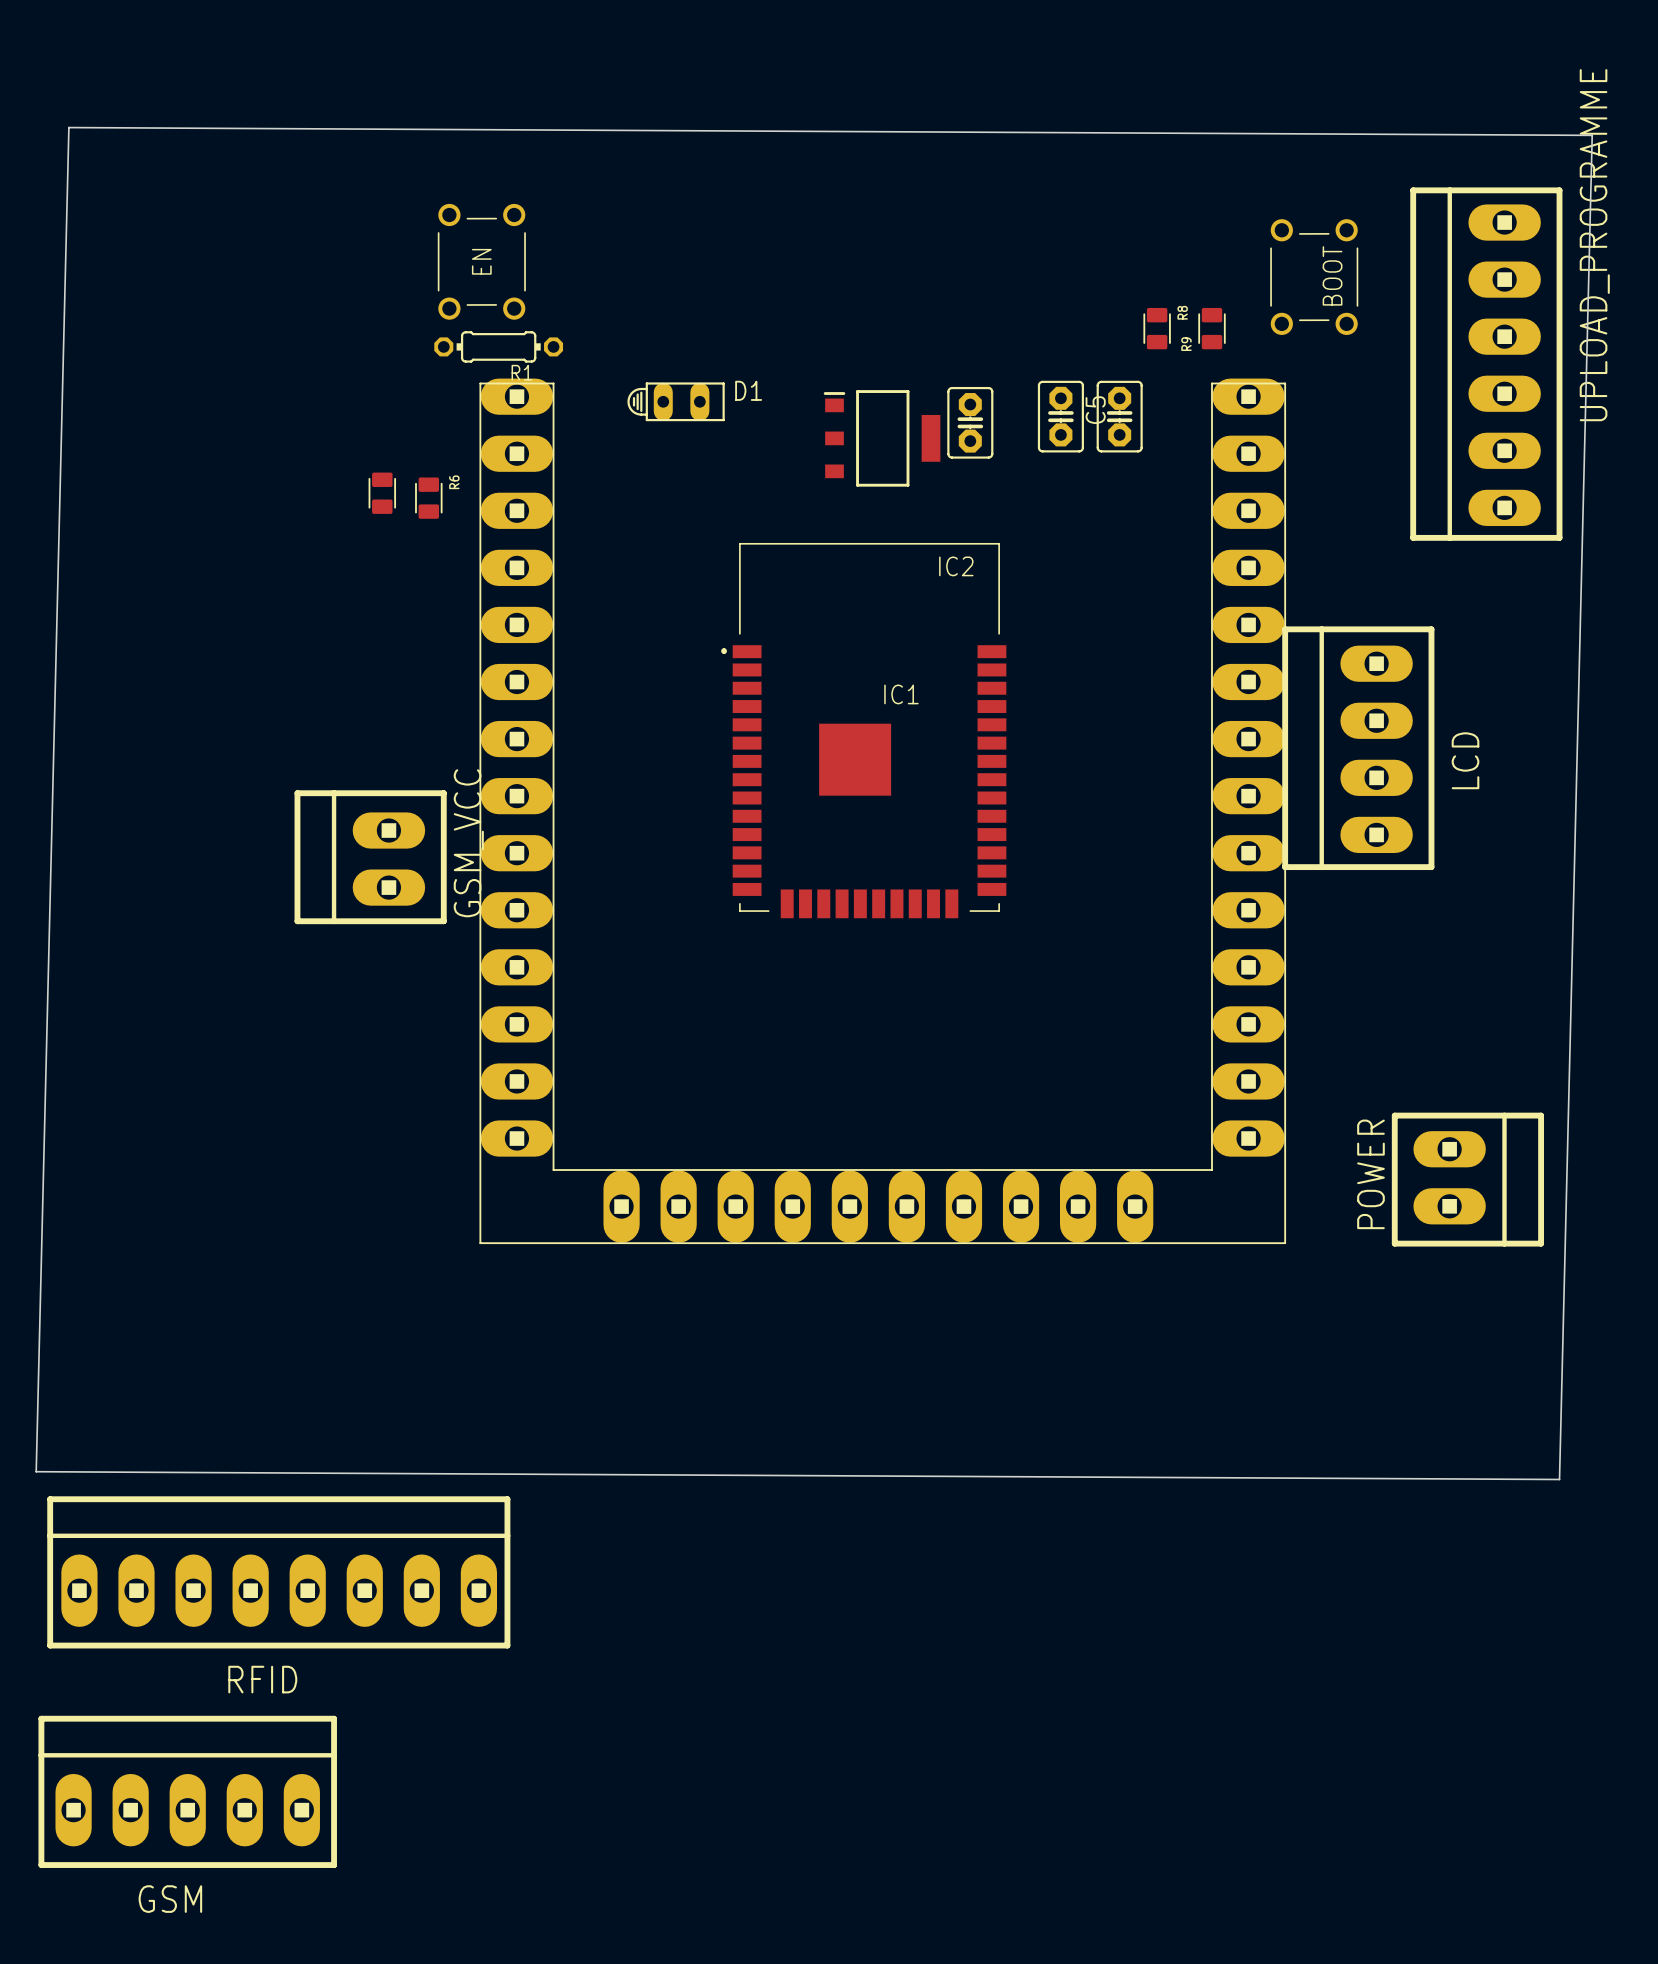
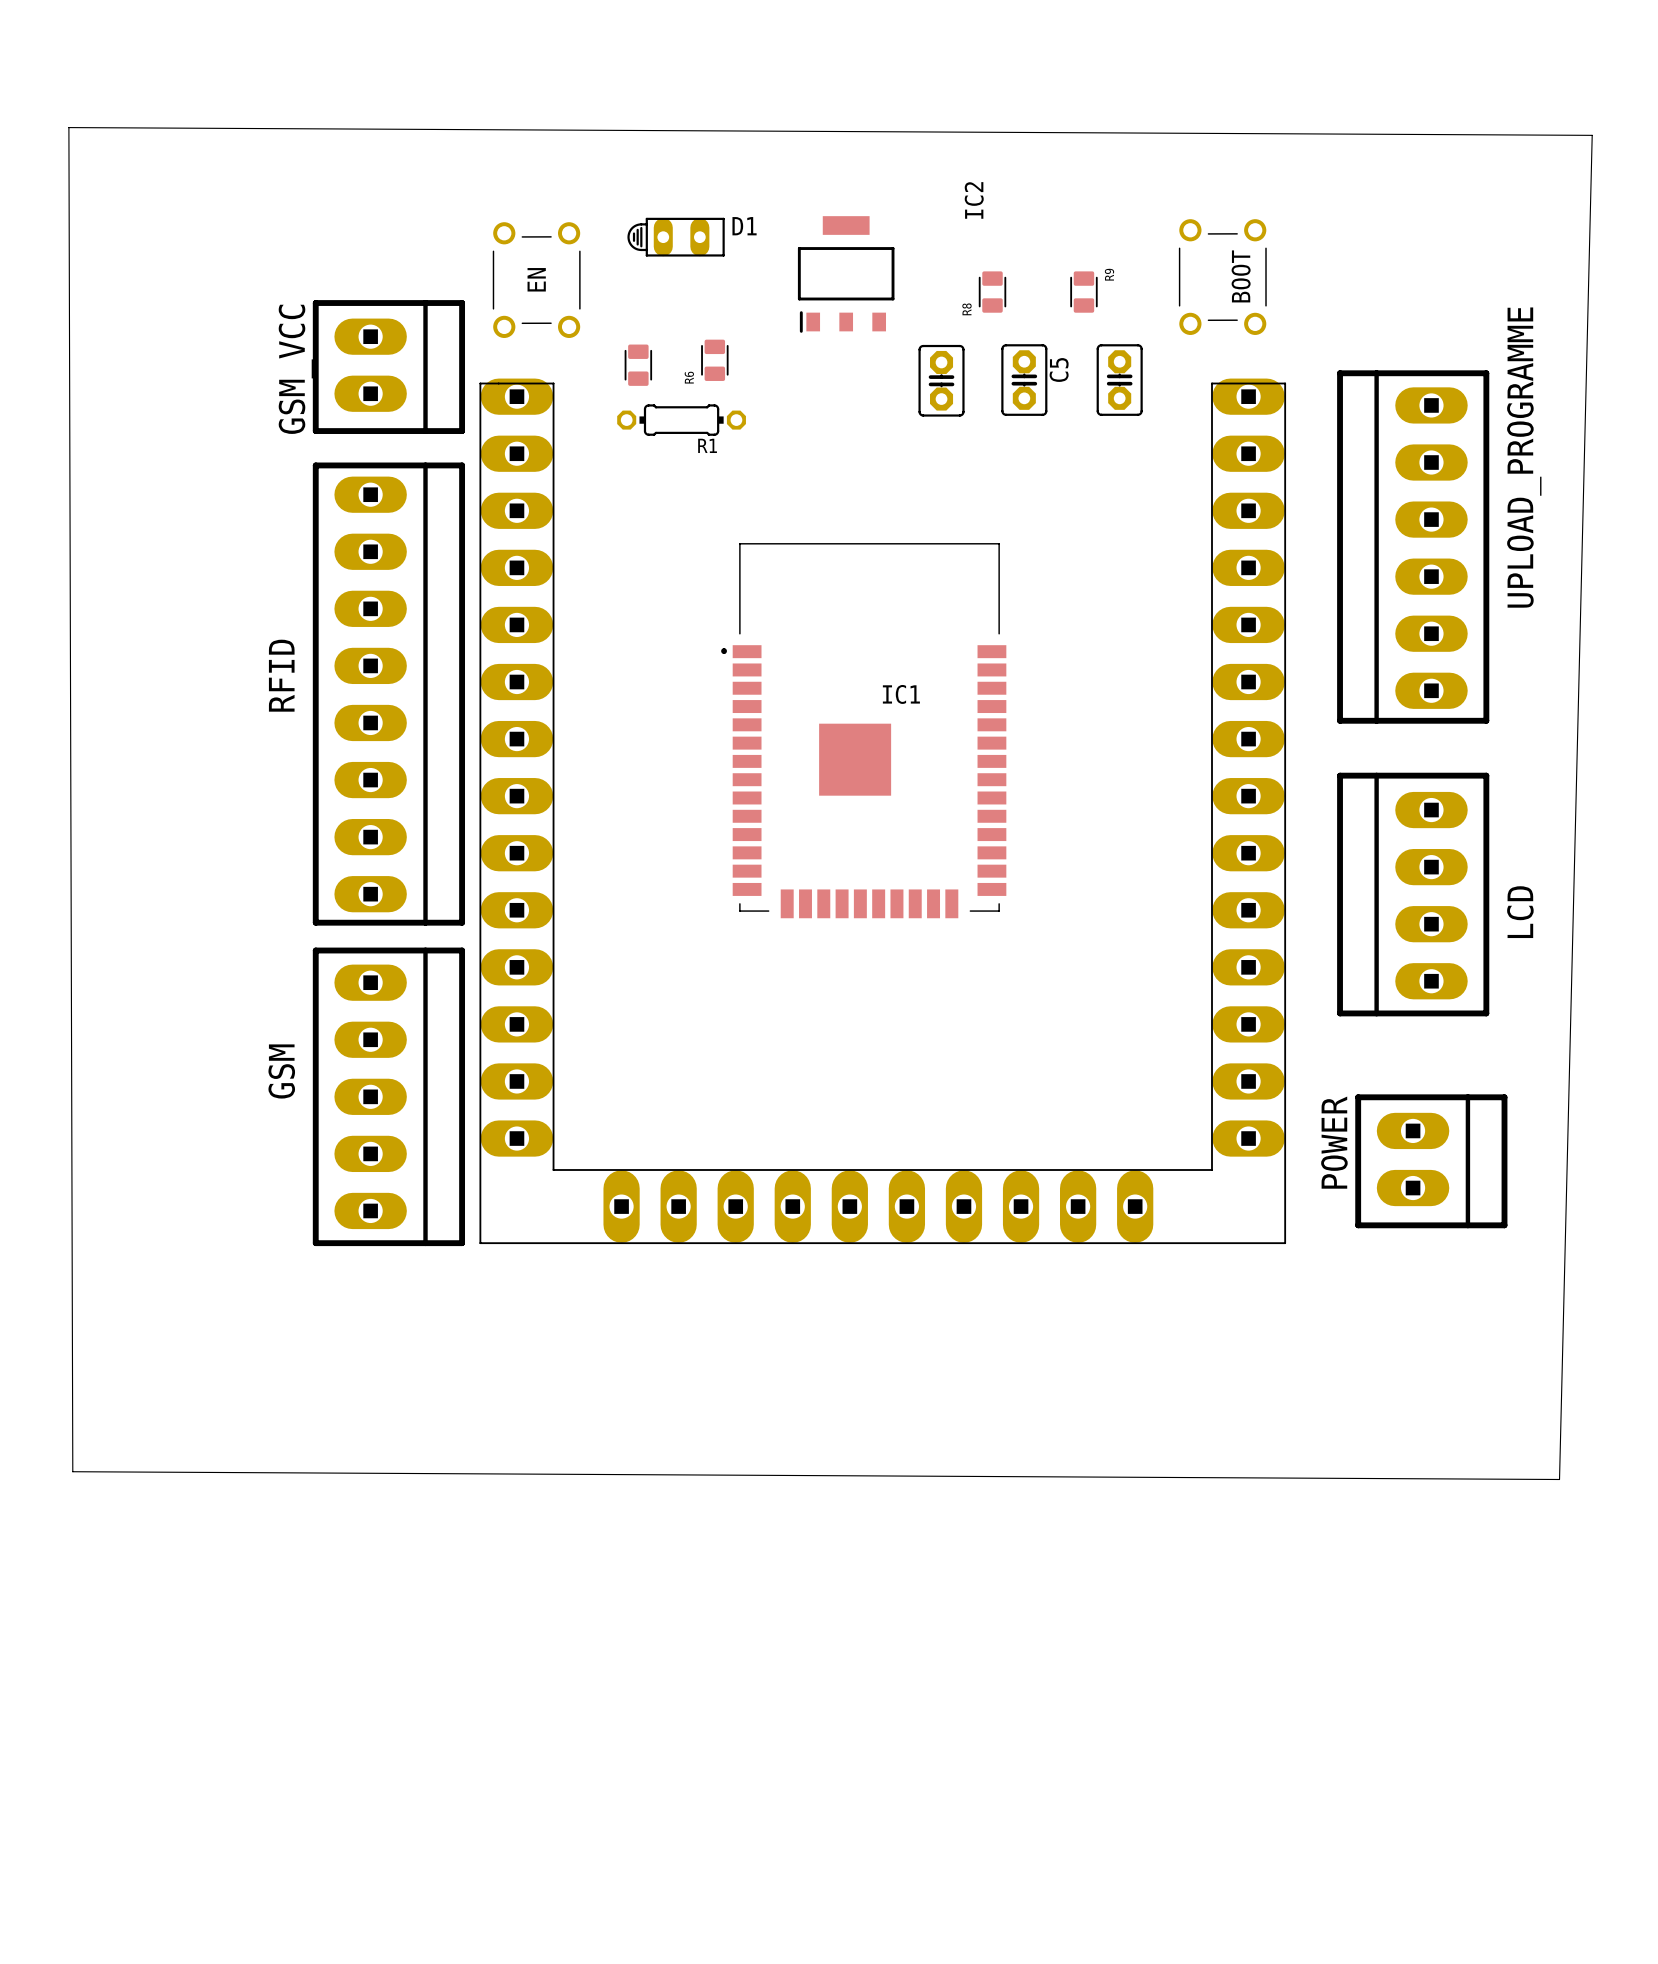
board edge: (68, 127) (36, 1471) (1559, 1479) -> (68, 127) (72, 1471) (1559, 1479)
EN position: (481, 261) -> (536, 280)
BOOT position: (1314, 277) -> (1222, 277)
R8 name position: R8 (1182, 312) -> R8 (966, 309)
R8 position: (1157, 328) -> (992, 292)
R9 position: (1211, 328) -> (1083, 292)
R9 name position: R9 (1186, 344) -> R9 (1109, 274)
R1 position: (498, 346) -> (681, 420)
UPLOAD_PROGRAMME position: (1486, 364) -> (1413, 547)
GSM_VCC: none -> (388, 367)
D1 position: (676, 401) -> (676, 237)
C5 position: (1060, 416) -> (1024, 380)
part position: (1119, 416) -> (1119, 380)
part position: (970, 422) -> (941, 380)
IC2 rotation: 0° (882, 438) -> 90° counterclockwise (846, 274)
IC2 position: (882, 438) -> (846, 274)
R6 name position: R6 (454, 482) -> R6 (689, 377)
part position: (382, 493) -> (638, 365)
R6 position: (428, 498) -> (714, 360)
RFID: none -> (388, 694)
LCD position: (1358, 748) -> (1413, 894)
GSM_VCC: (370, 857) -> none
GSM: none -> (388, 1096)
POWER position: (1467, 1179) -> (1431, 1161)
RFID: (278, 1572) -> none
GSM: (187, 1791) -> none

